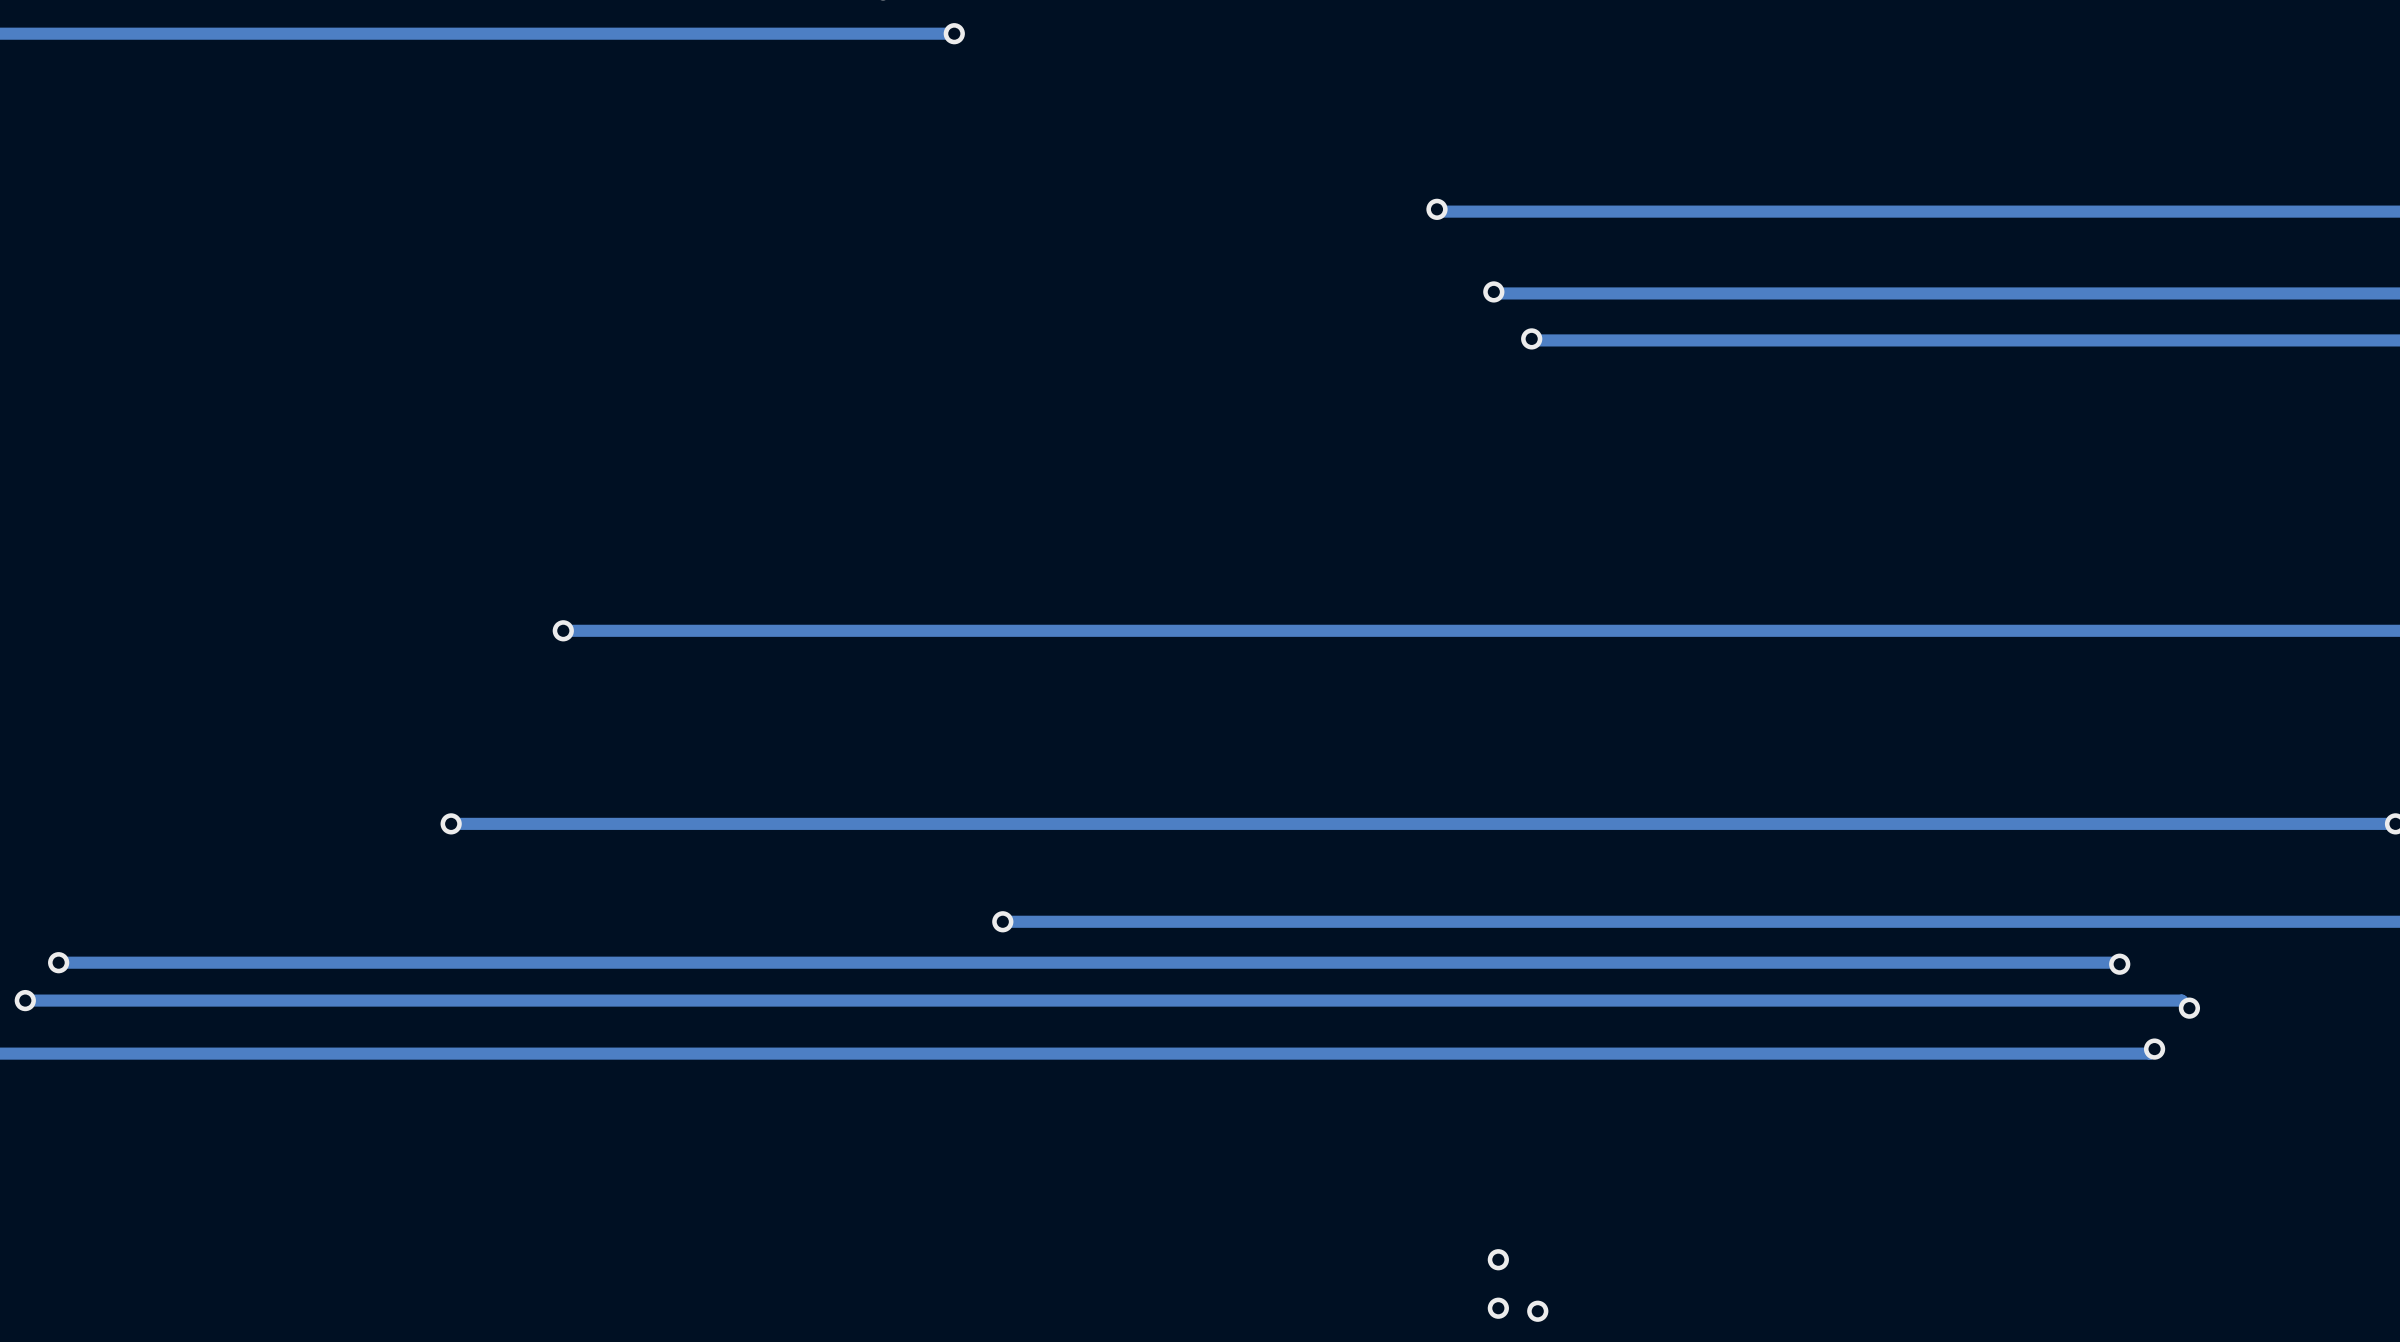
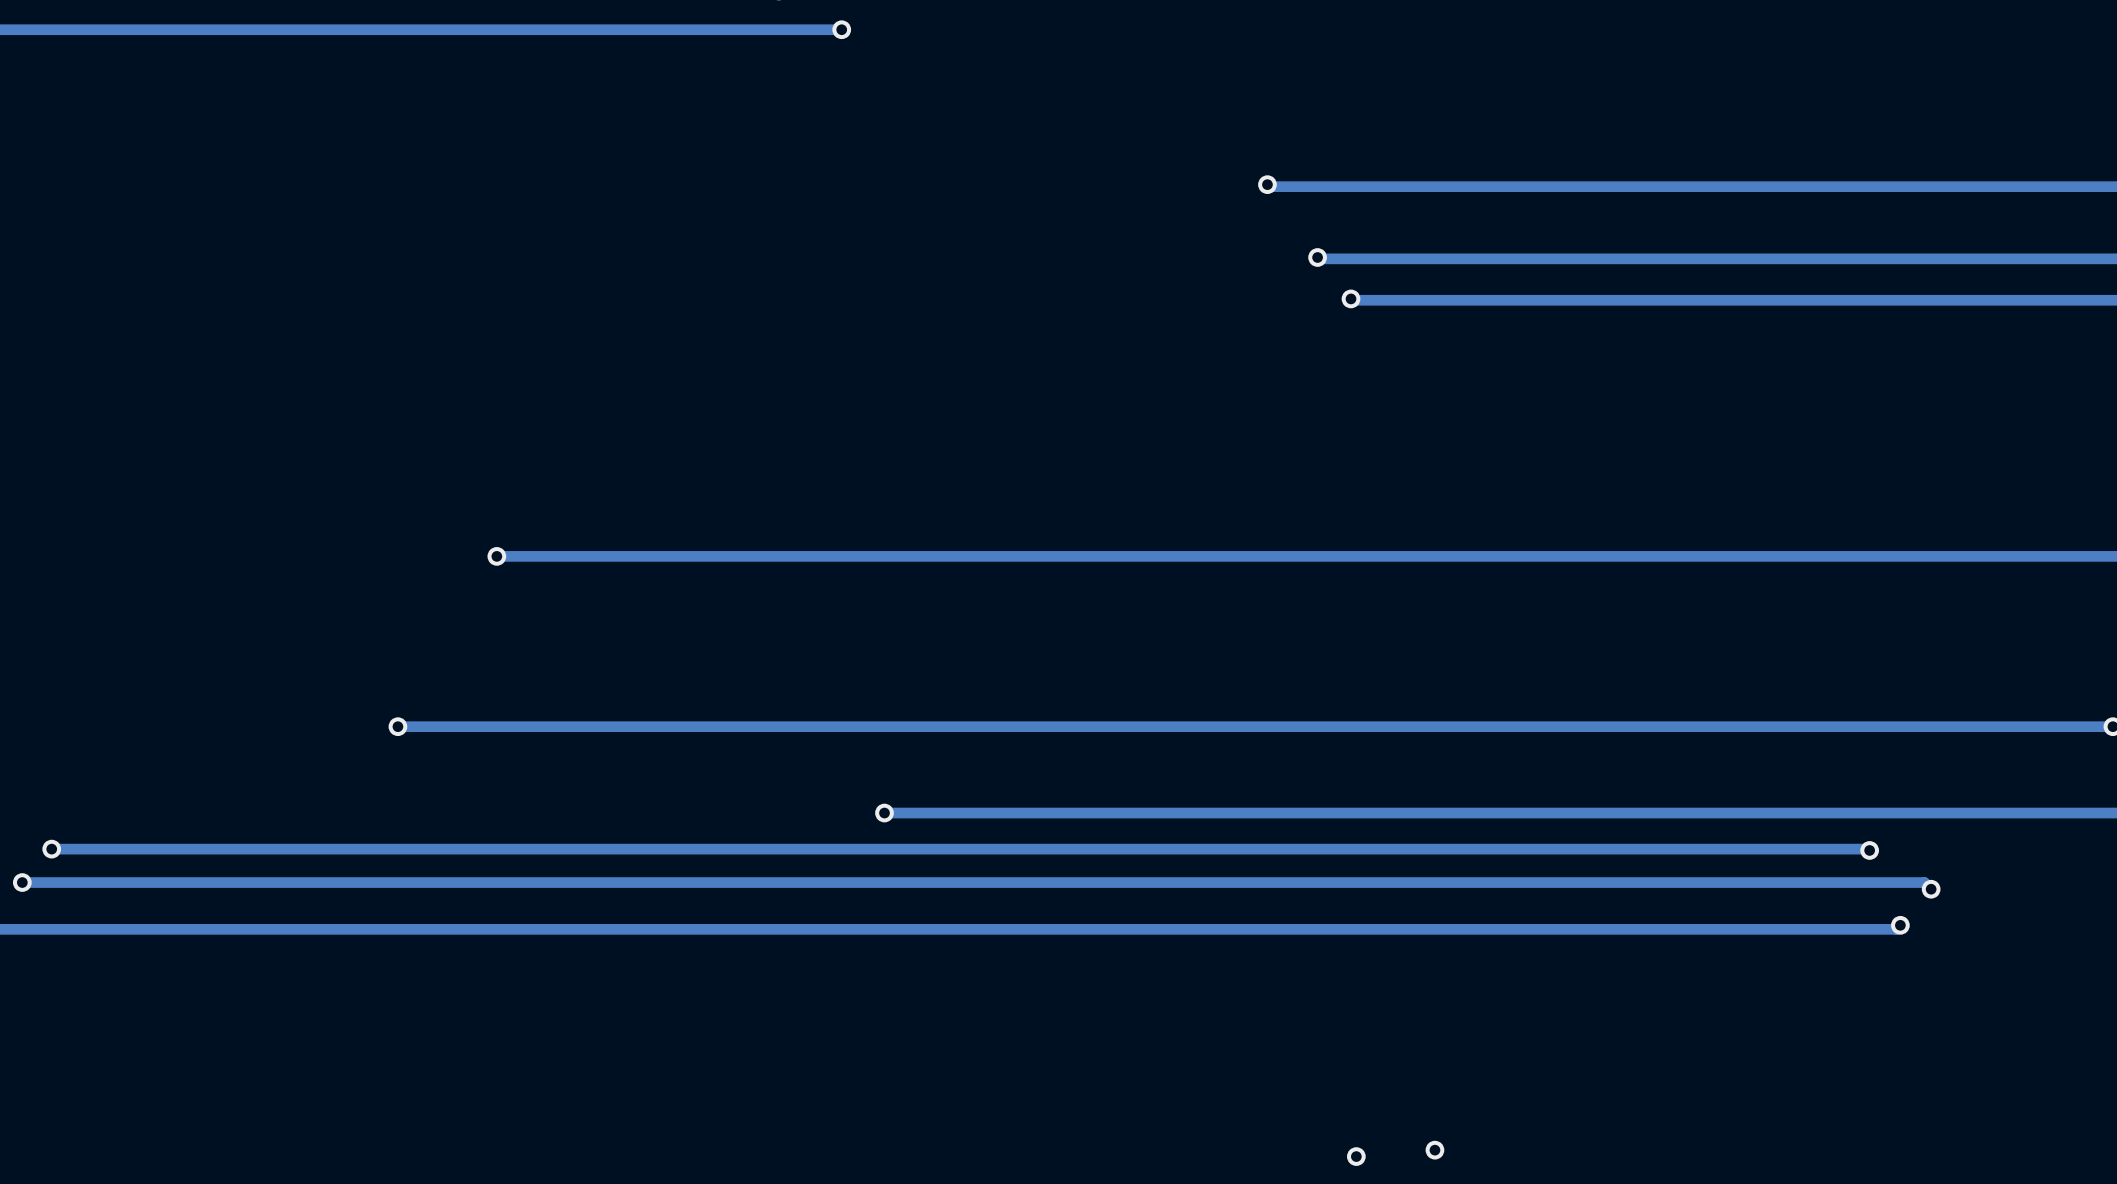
via: (1498, 1259) -> none
via: none -> (1434, 1150)
via: (1498, 1308) -> none

